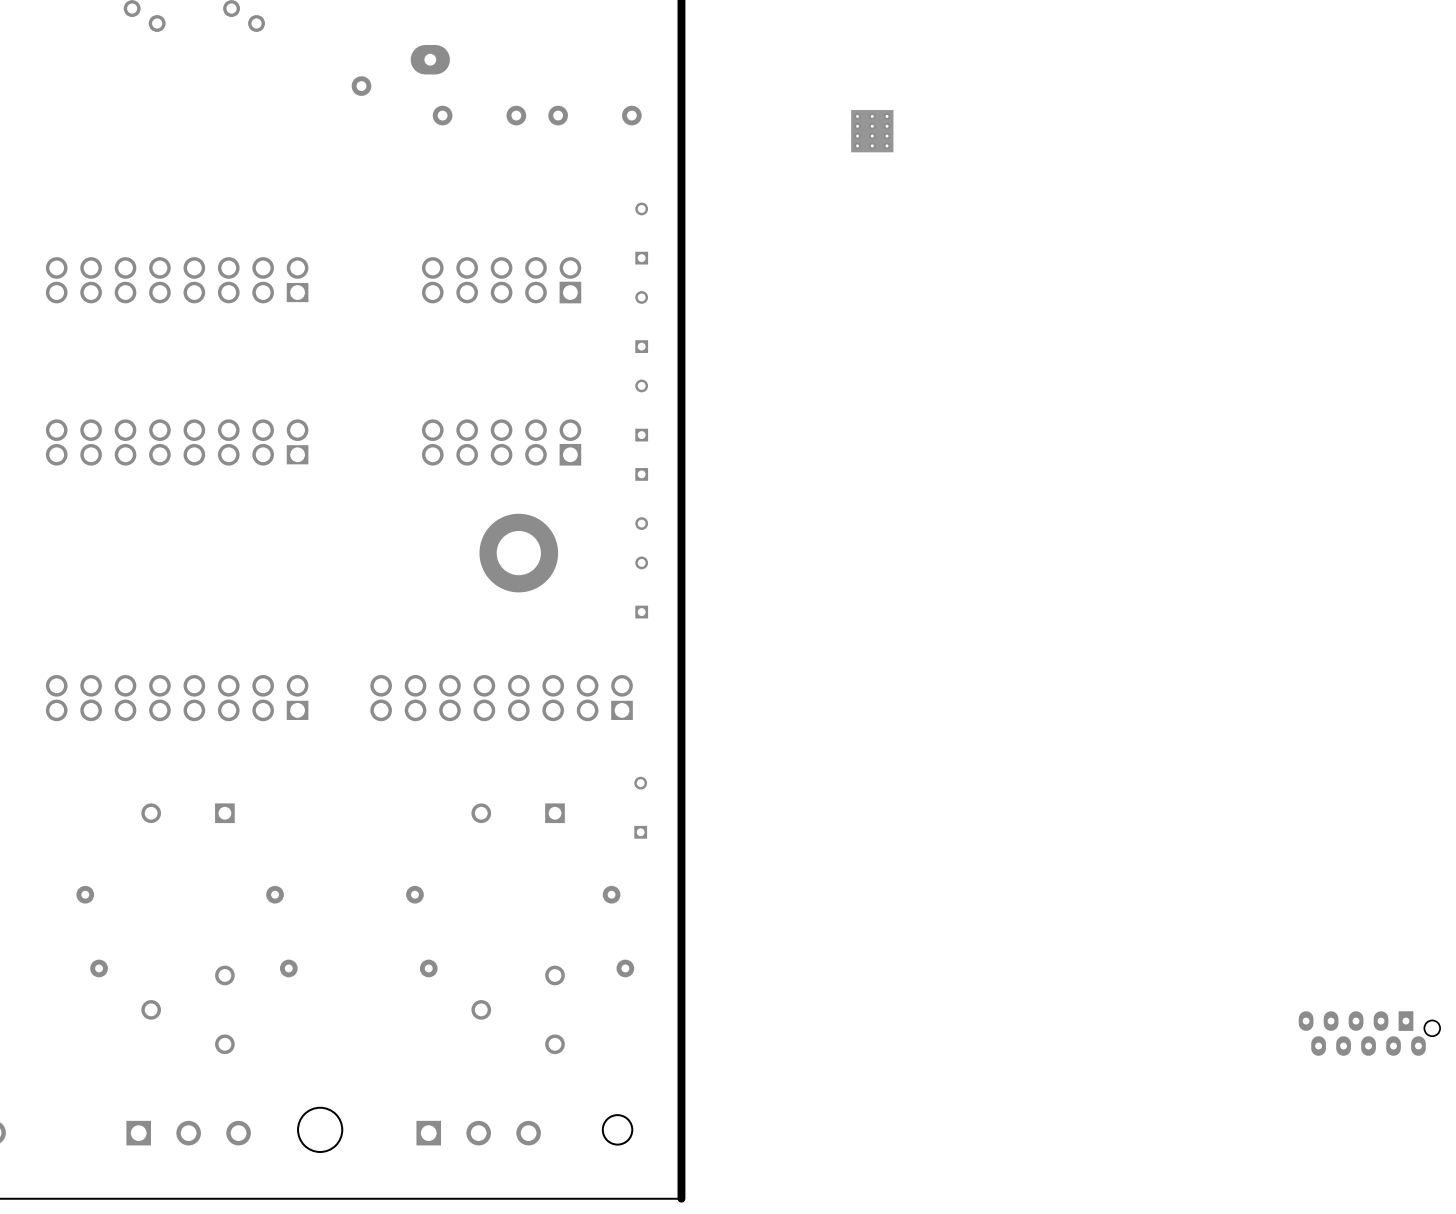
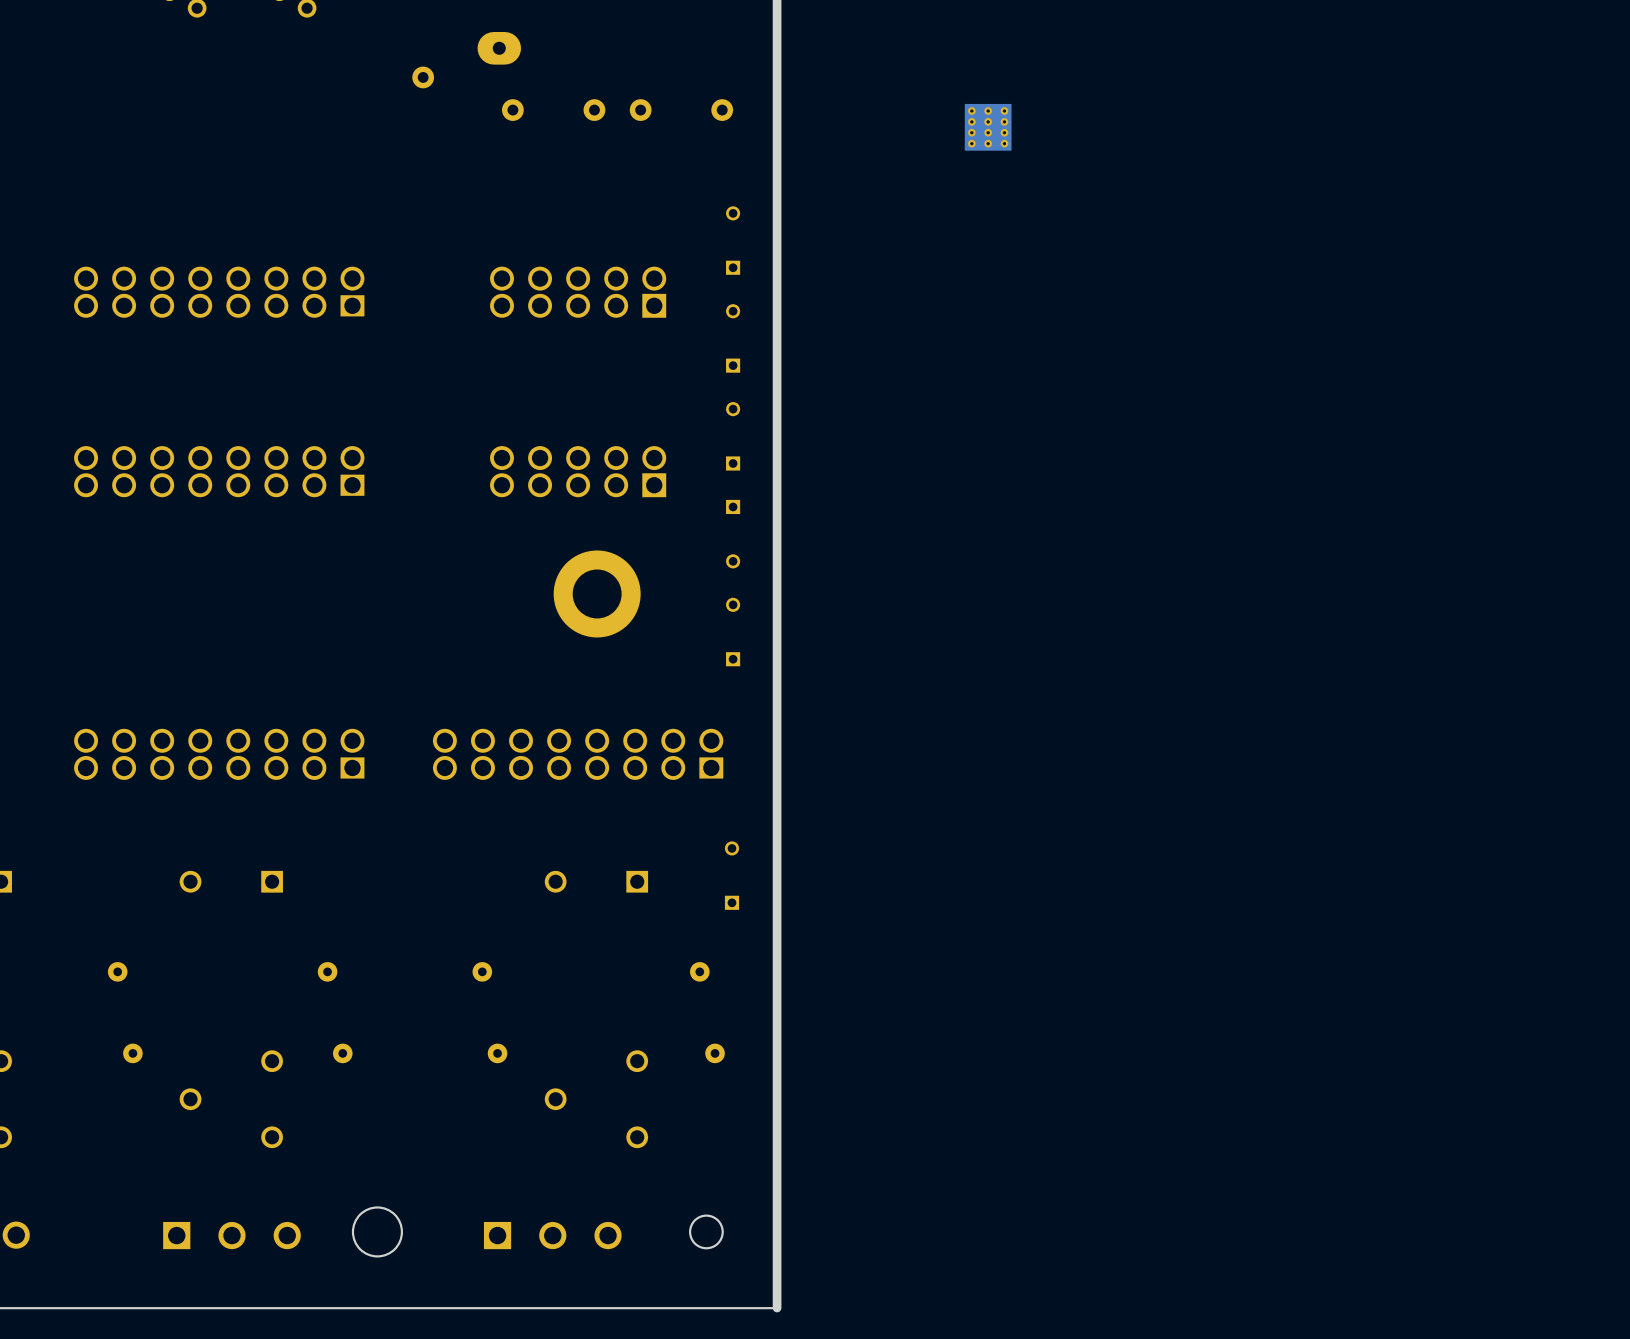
part: (1369, 1033) -> none

